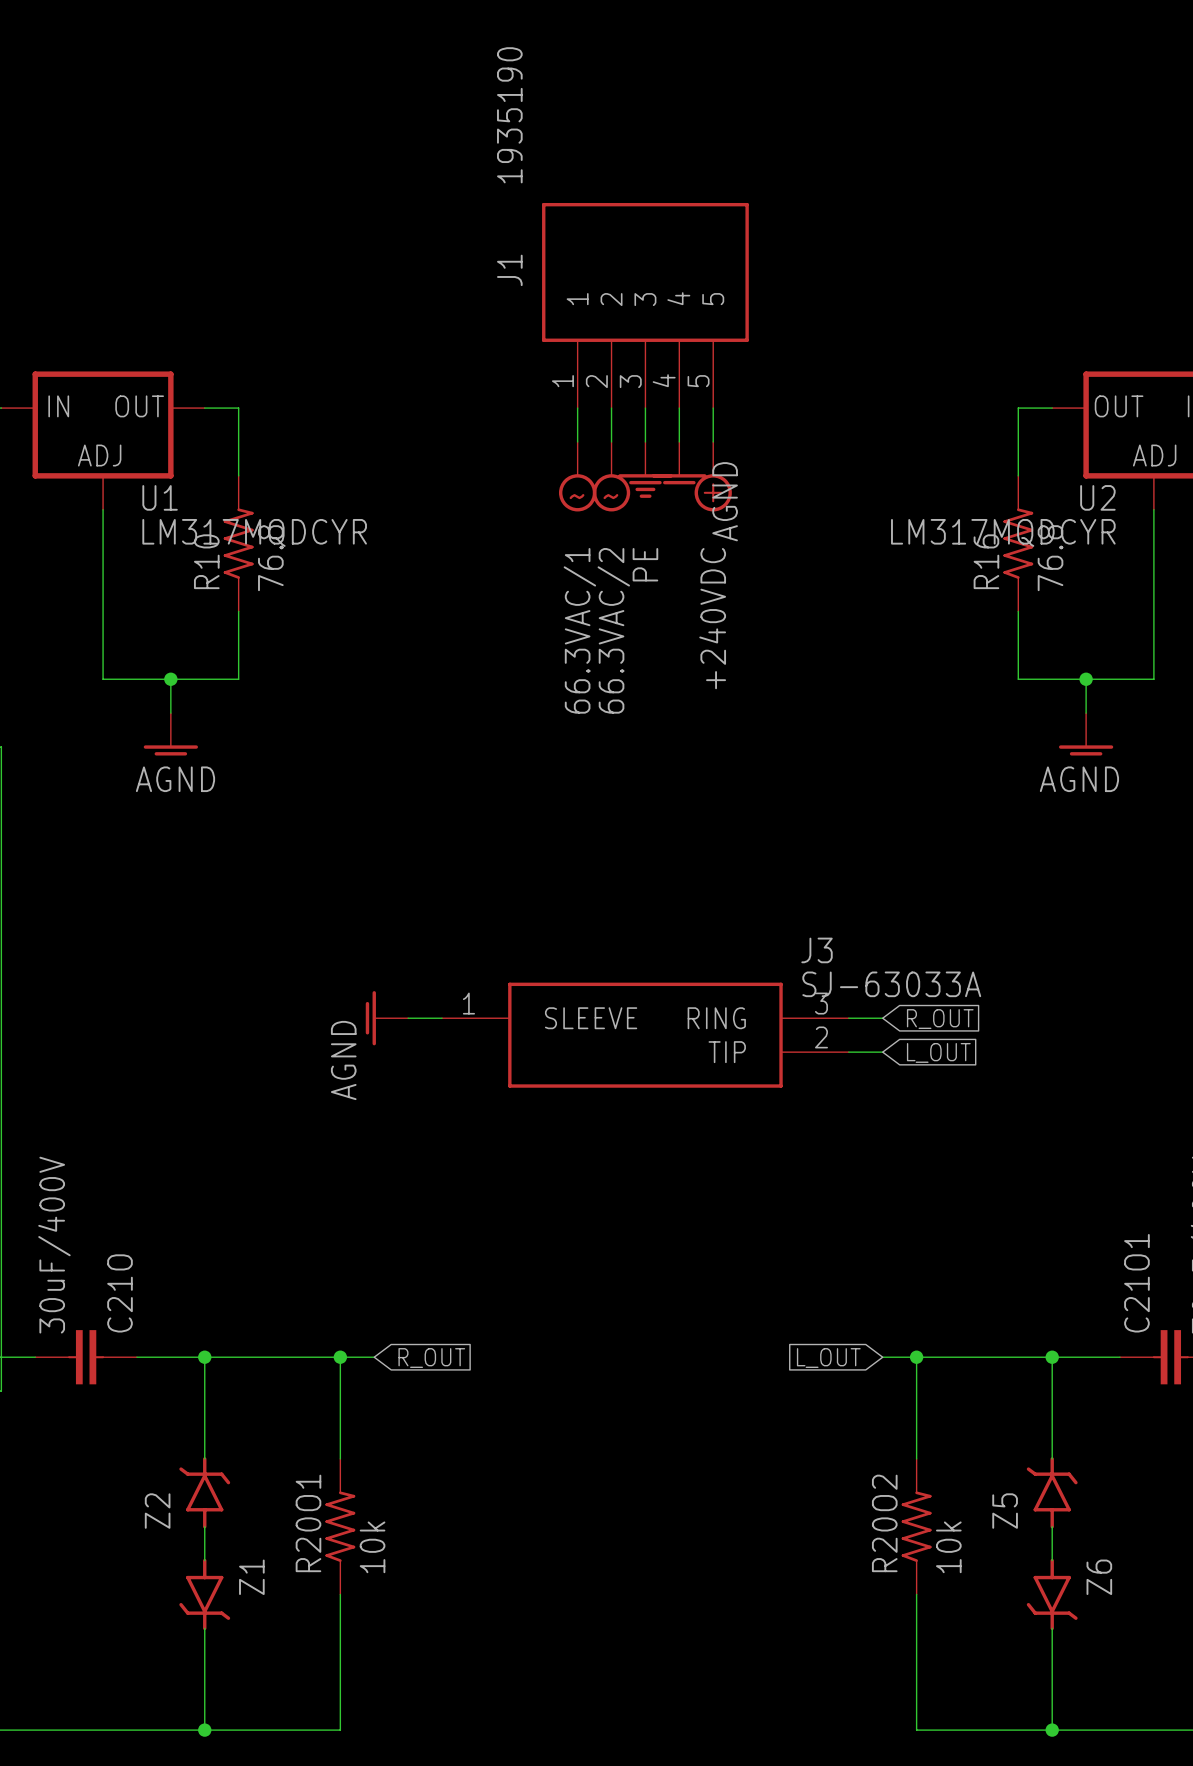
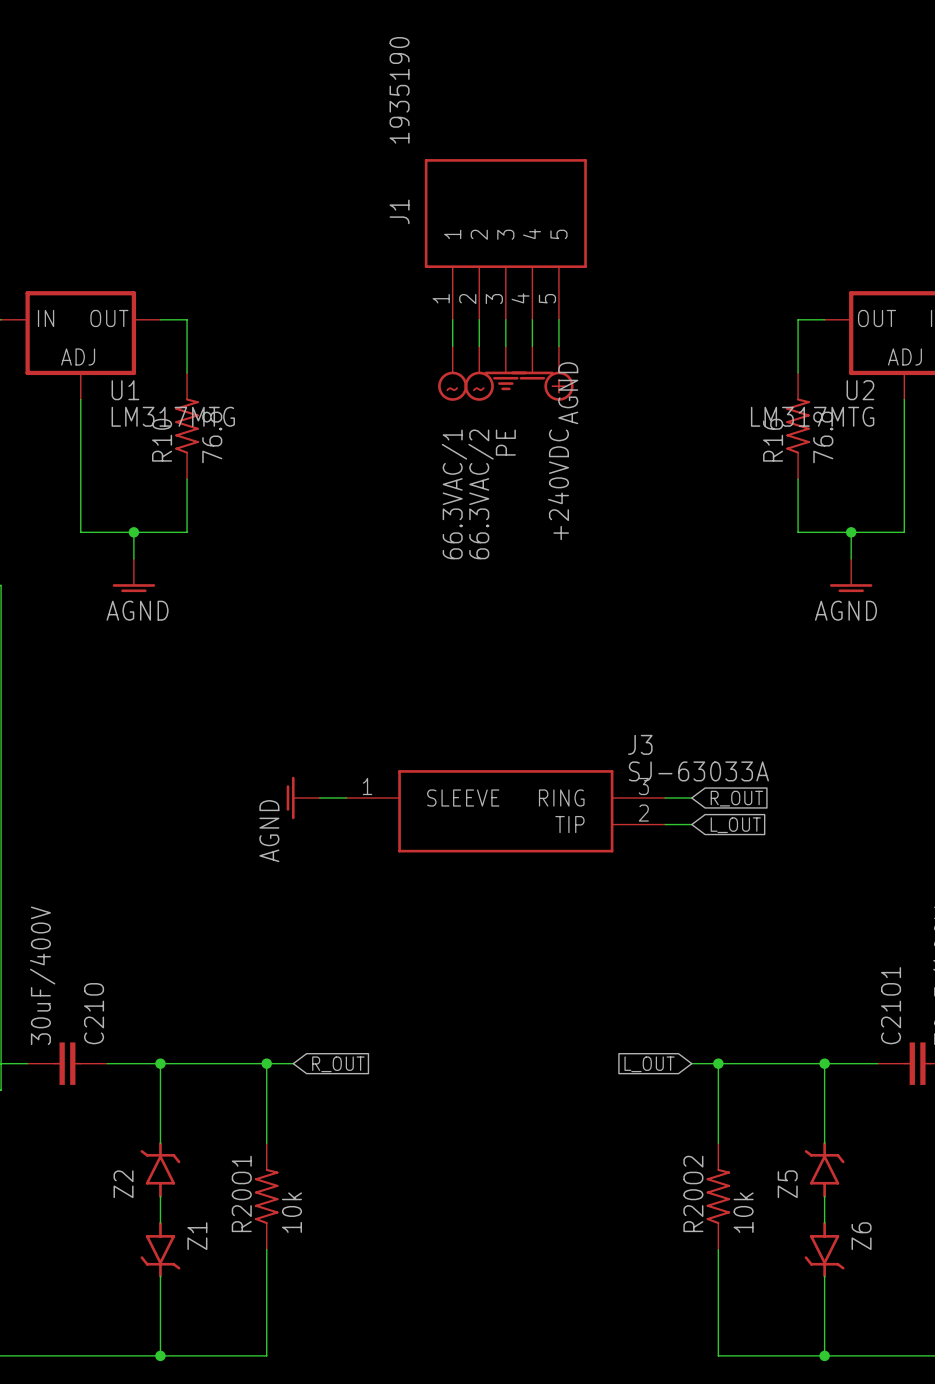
U1 value: LM317MQDCYR (254, 532) -> LM317MTG (173, 416)
U2 value: LM317MQDCYR (1003, 532) -> LM317MTG (812, 416)

